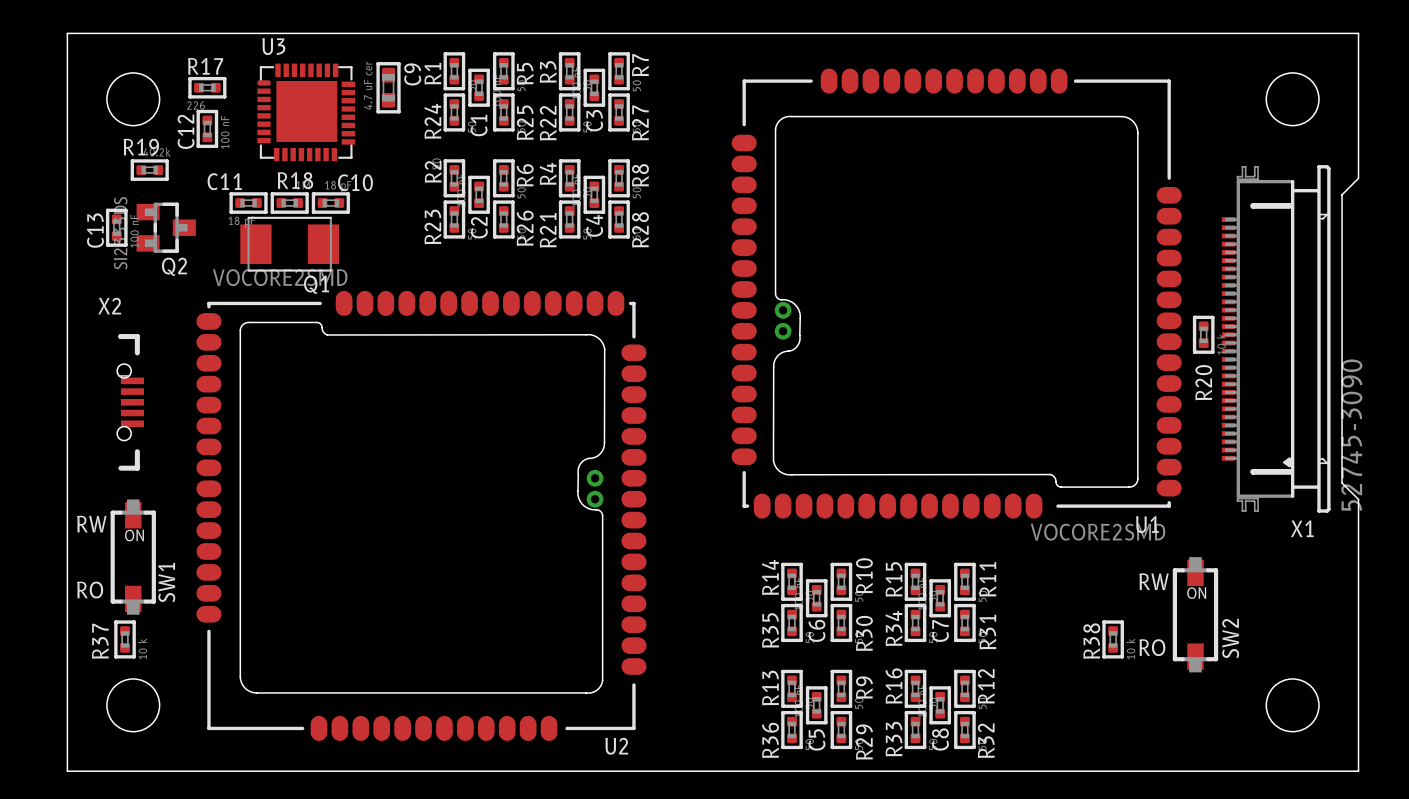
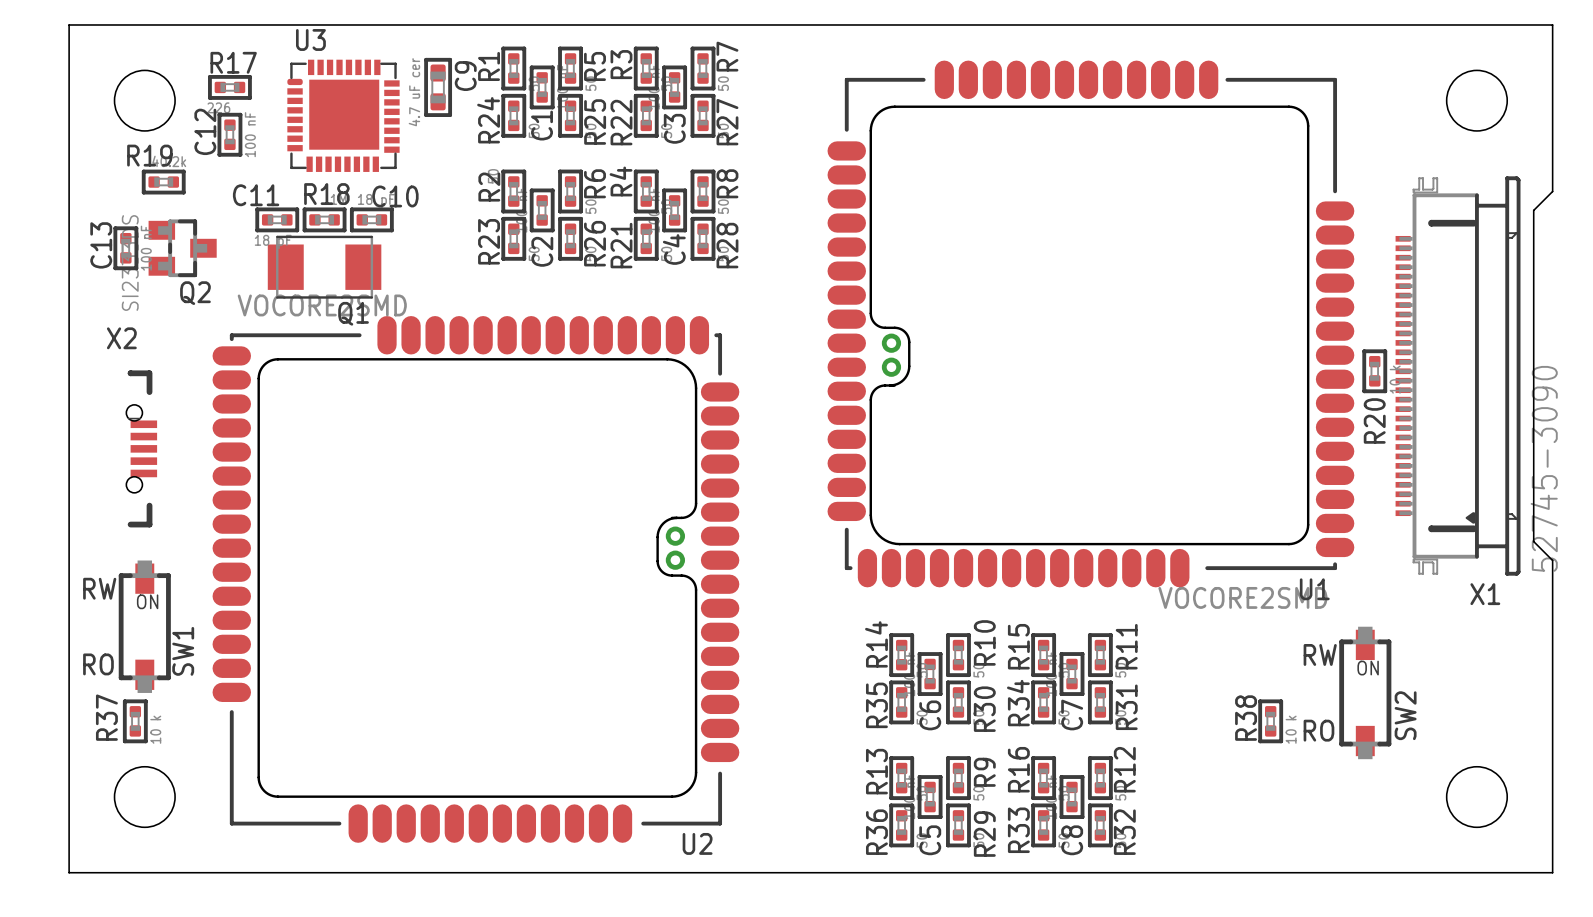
U1 footprint: [731, 68, 1182, 519] -> [827, 60, 1355, 588]
U2 footprint: [196, 290, 647, 741] -> [212, 316, 740, 843]

